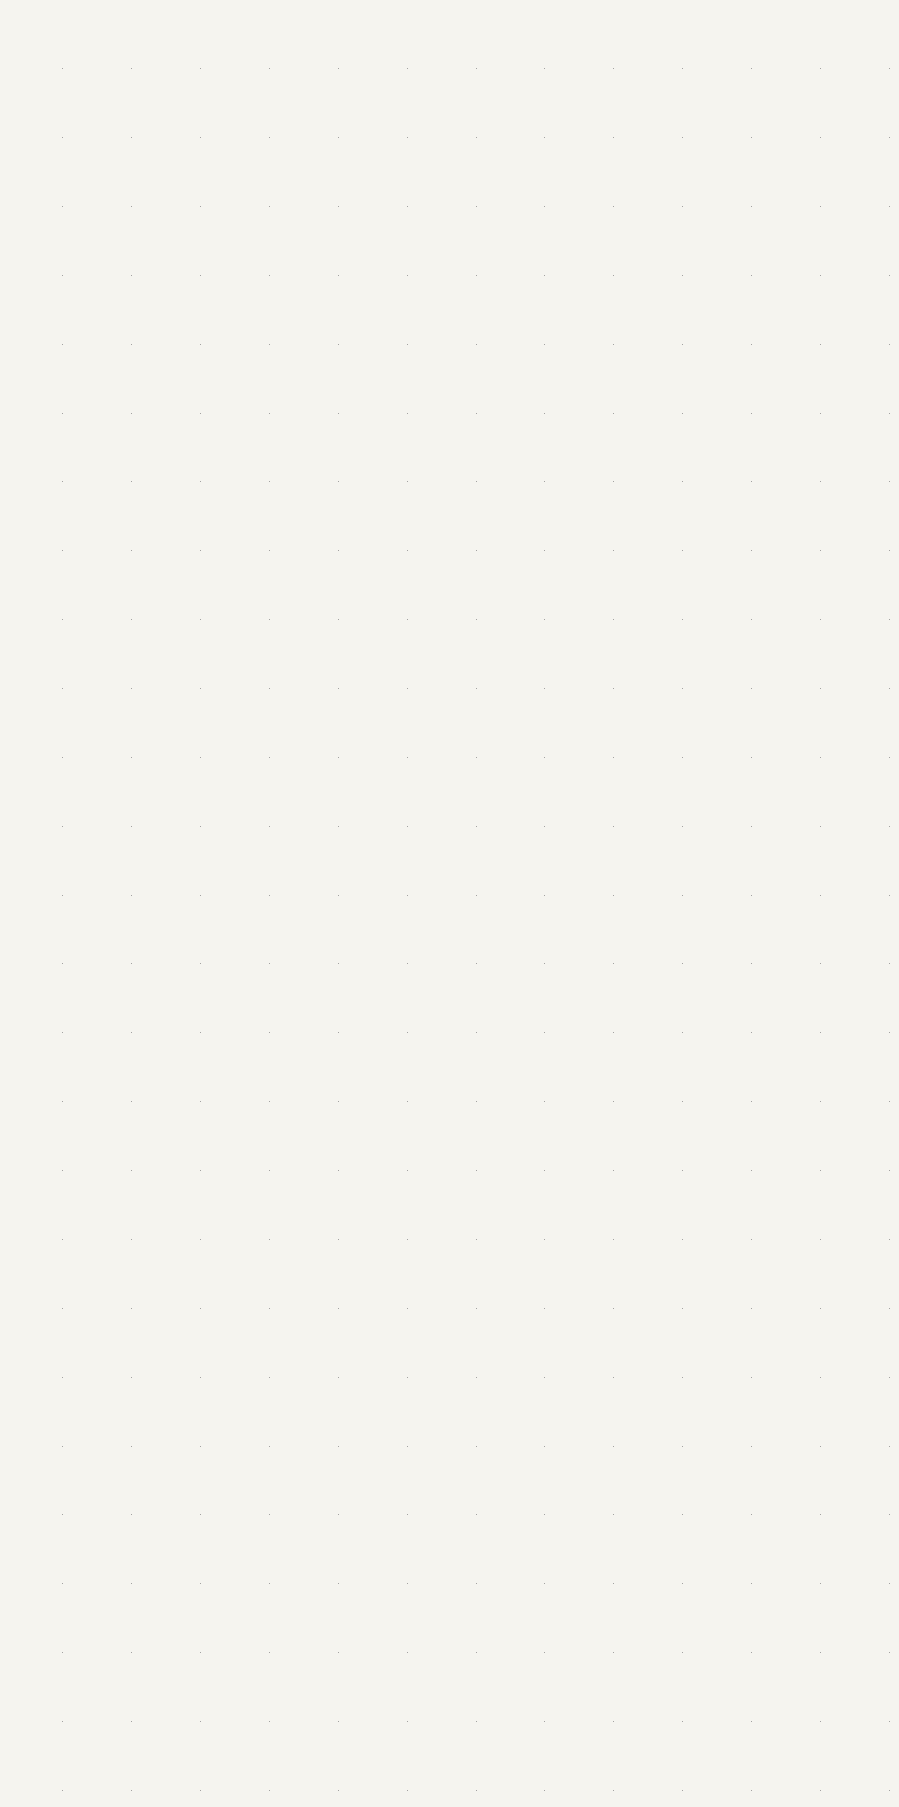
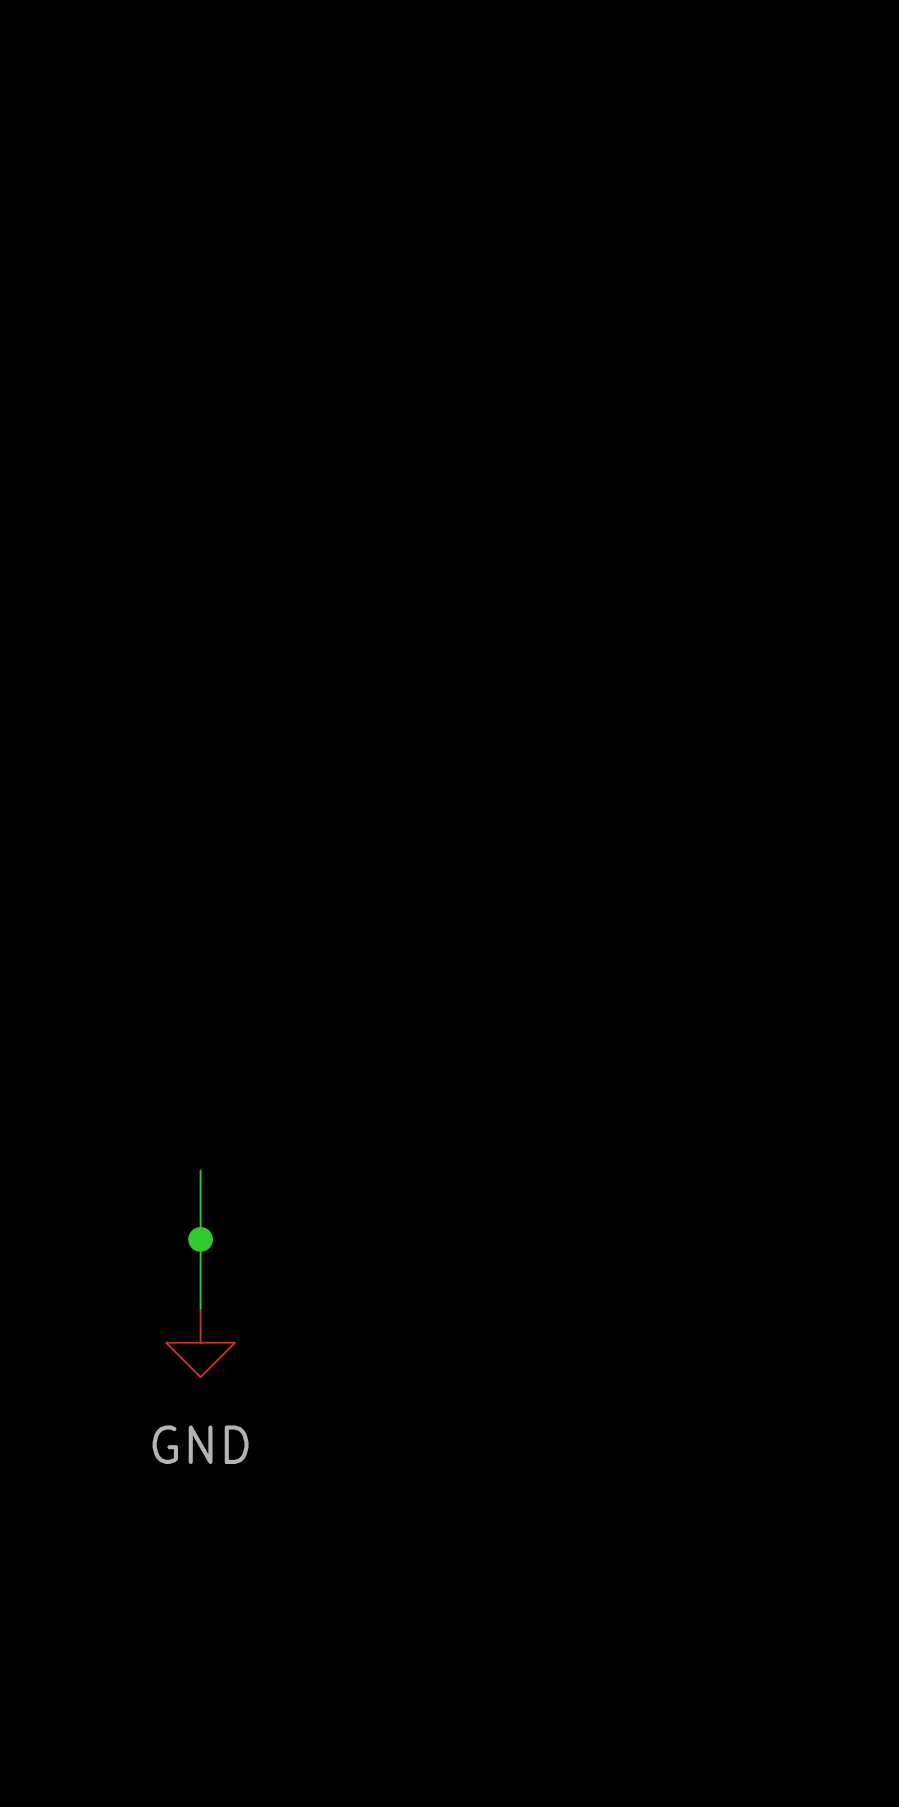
wire: none -> (200, 1170) (200, 1308)
junction: none -> (200, 1239)
power symbol: none -> GND (200, 1342)

